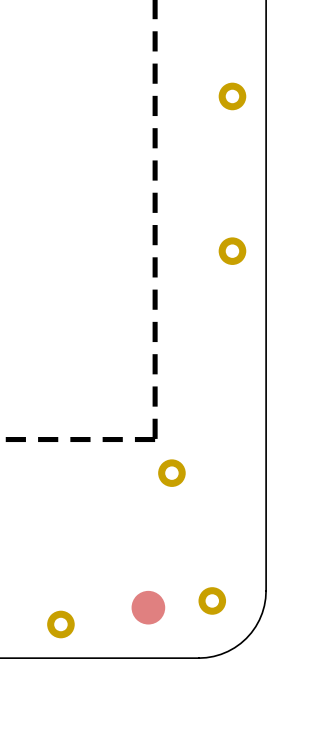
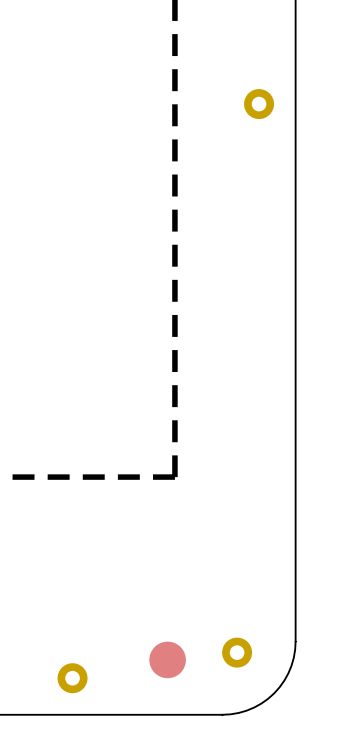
part: (232, 251) -> none
part: (171, 473) -> none

